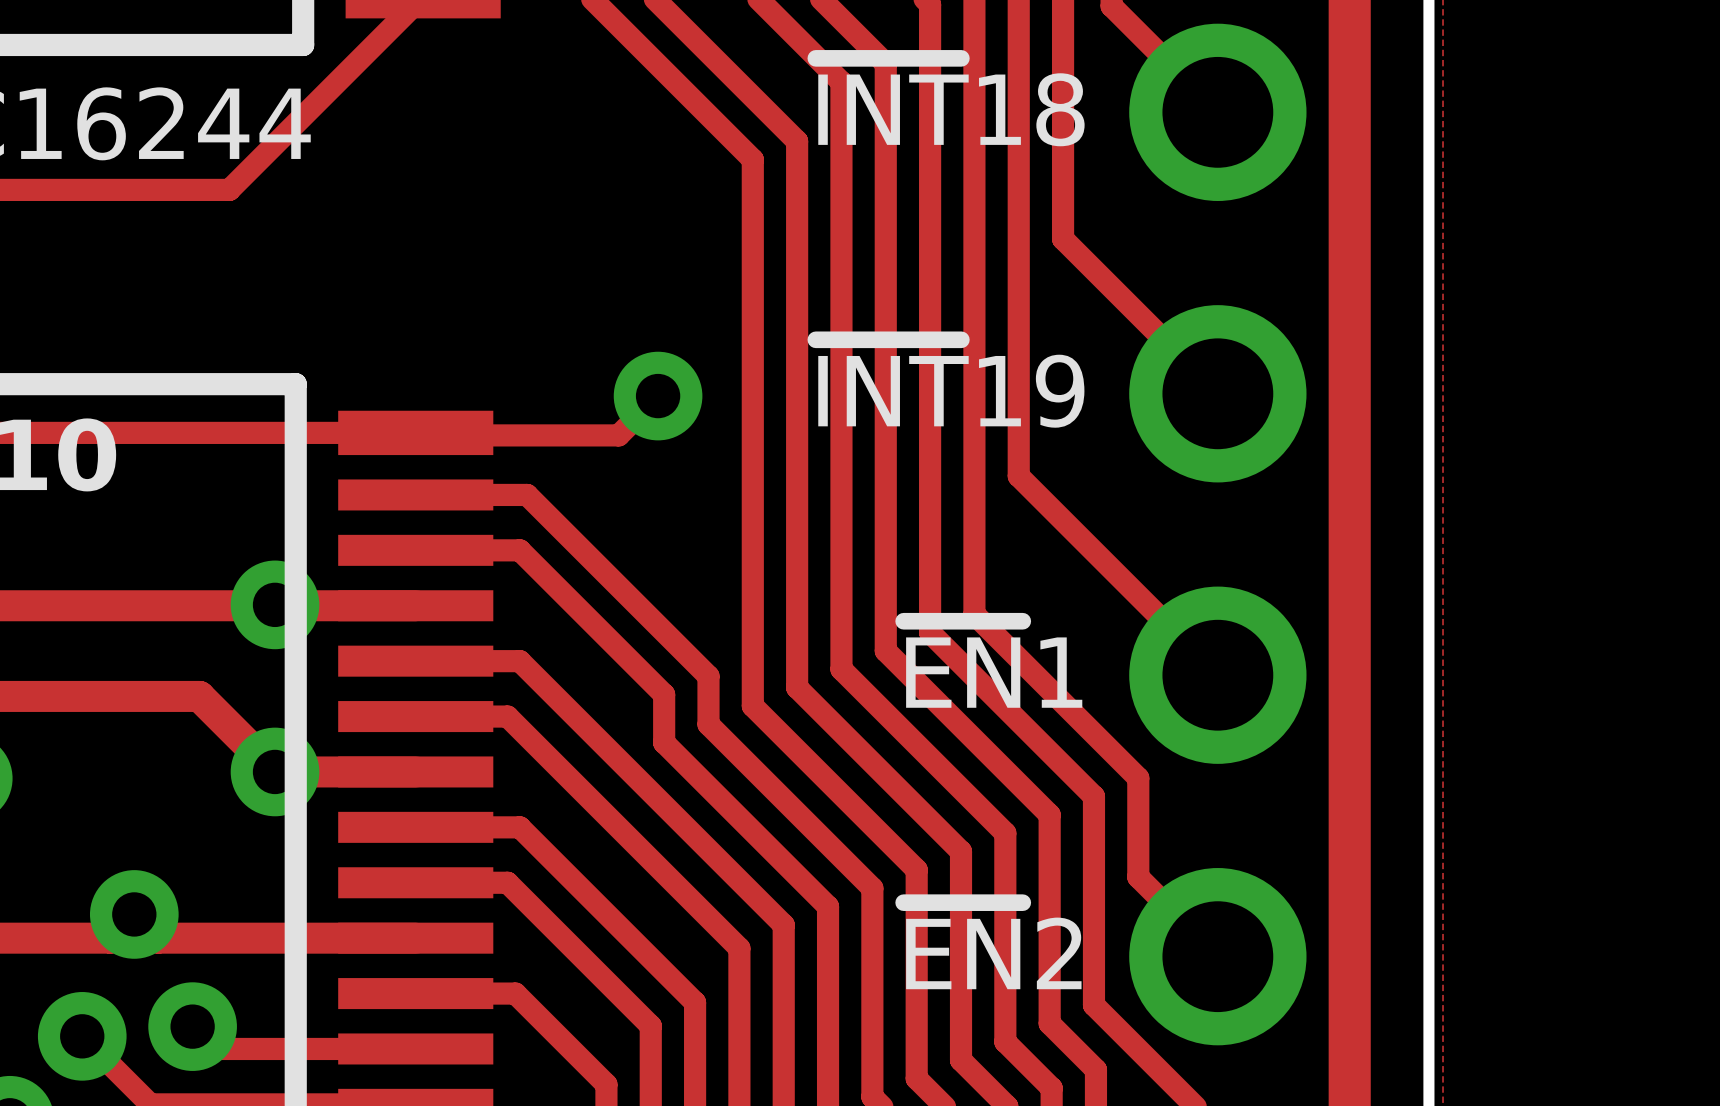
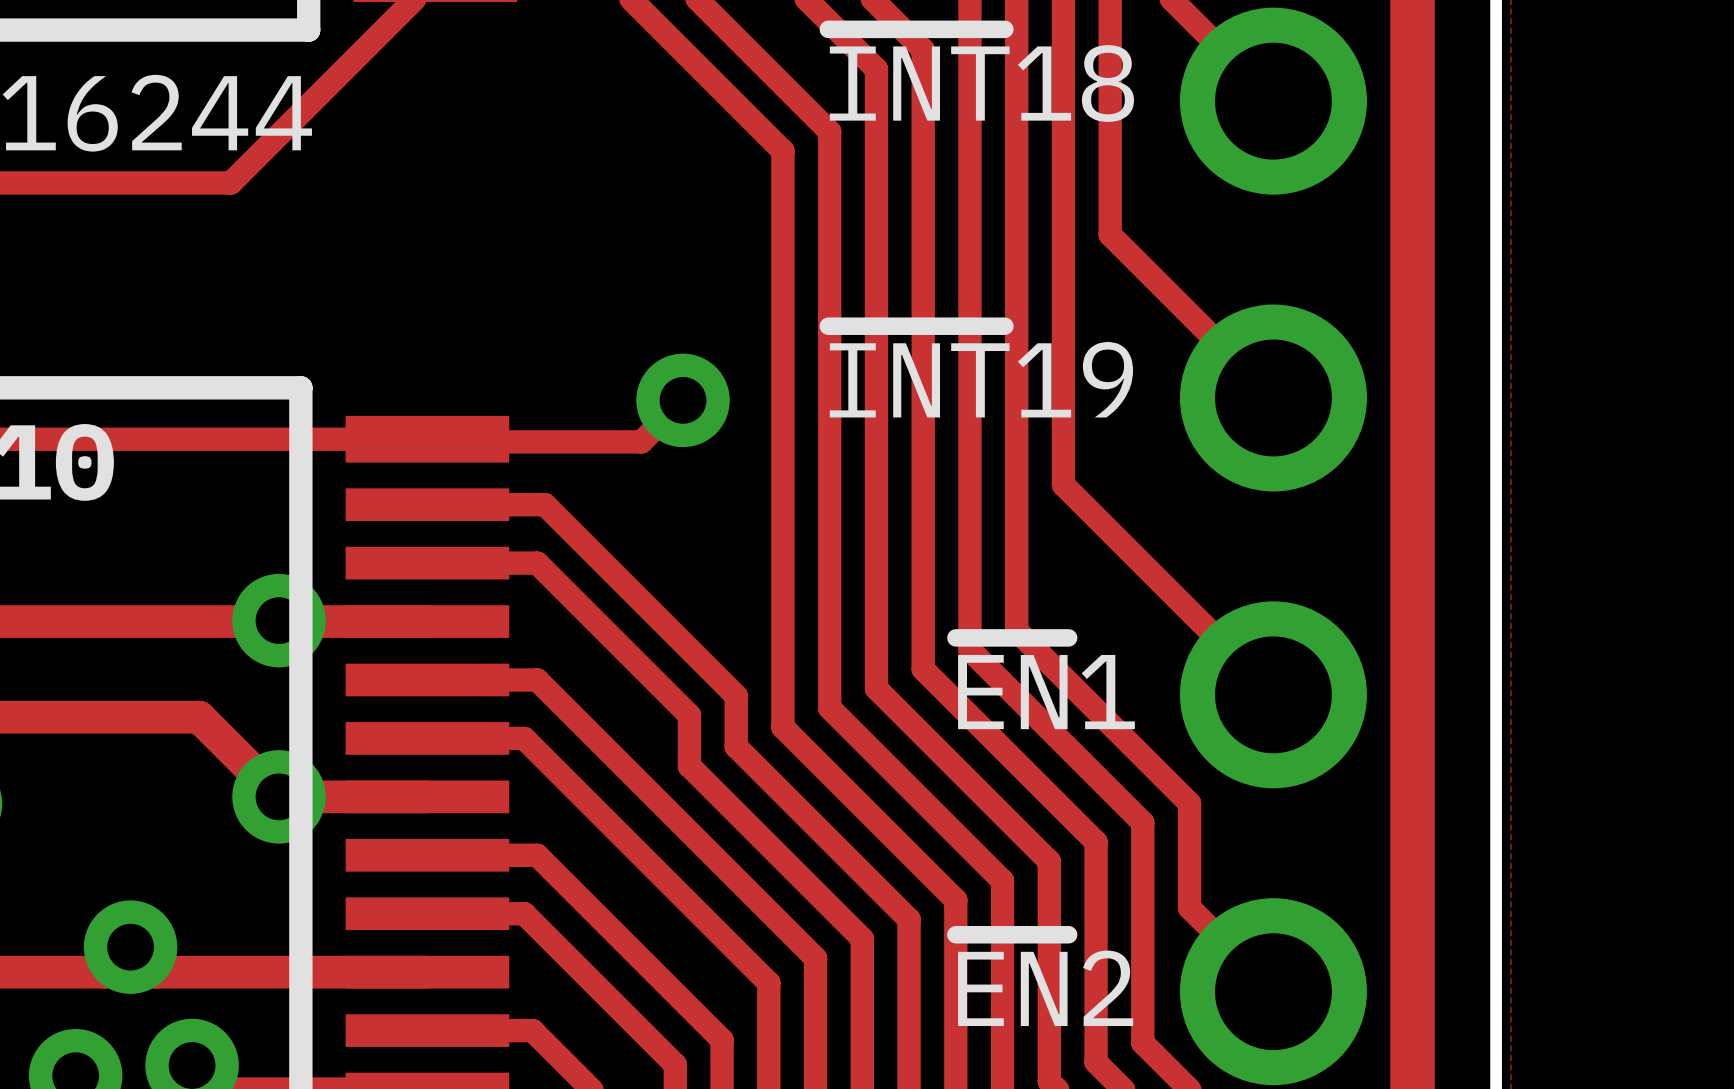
text position: ~{INT}18 (950, 102) -> ~{INT}18 (981, 75)
text position: ~{INT}19 (950, 383) -> ~{INT}19 (980, 371)

